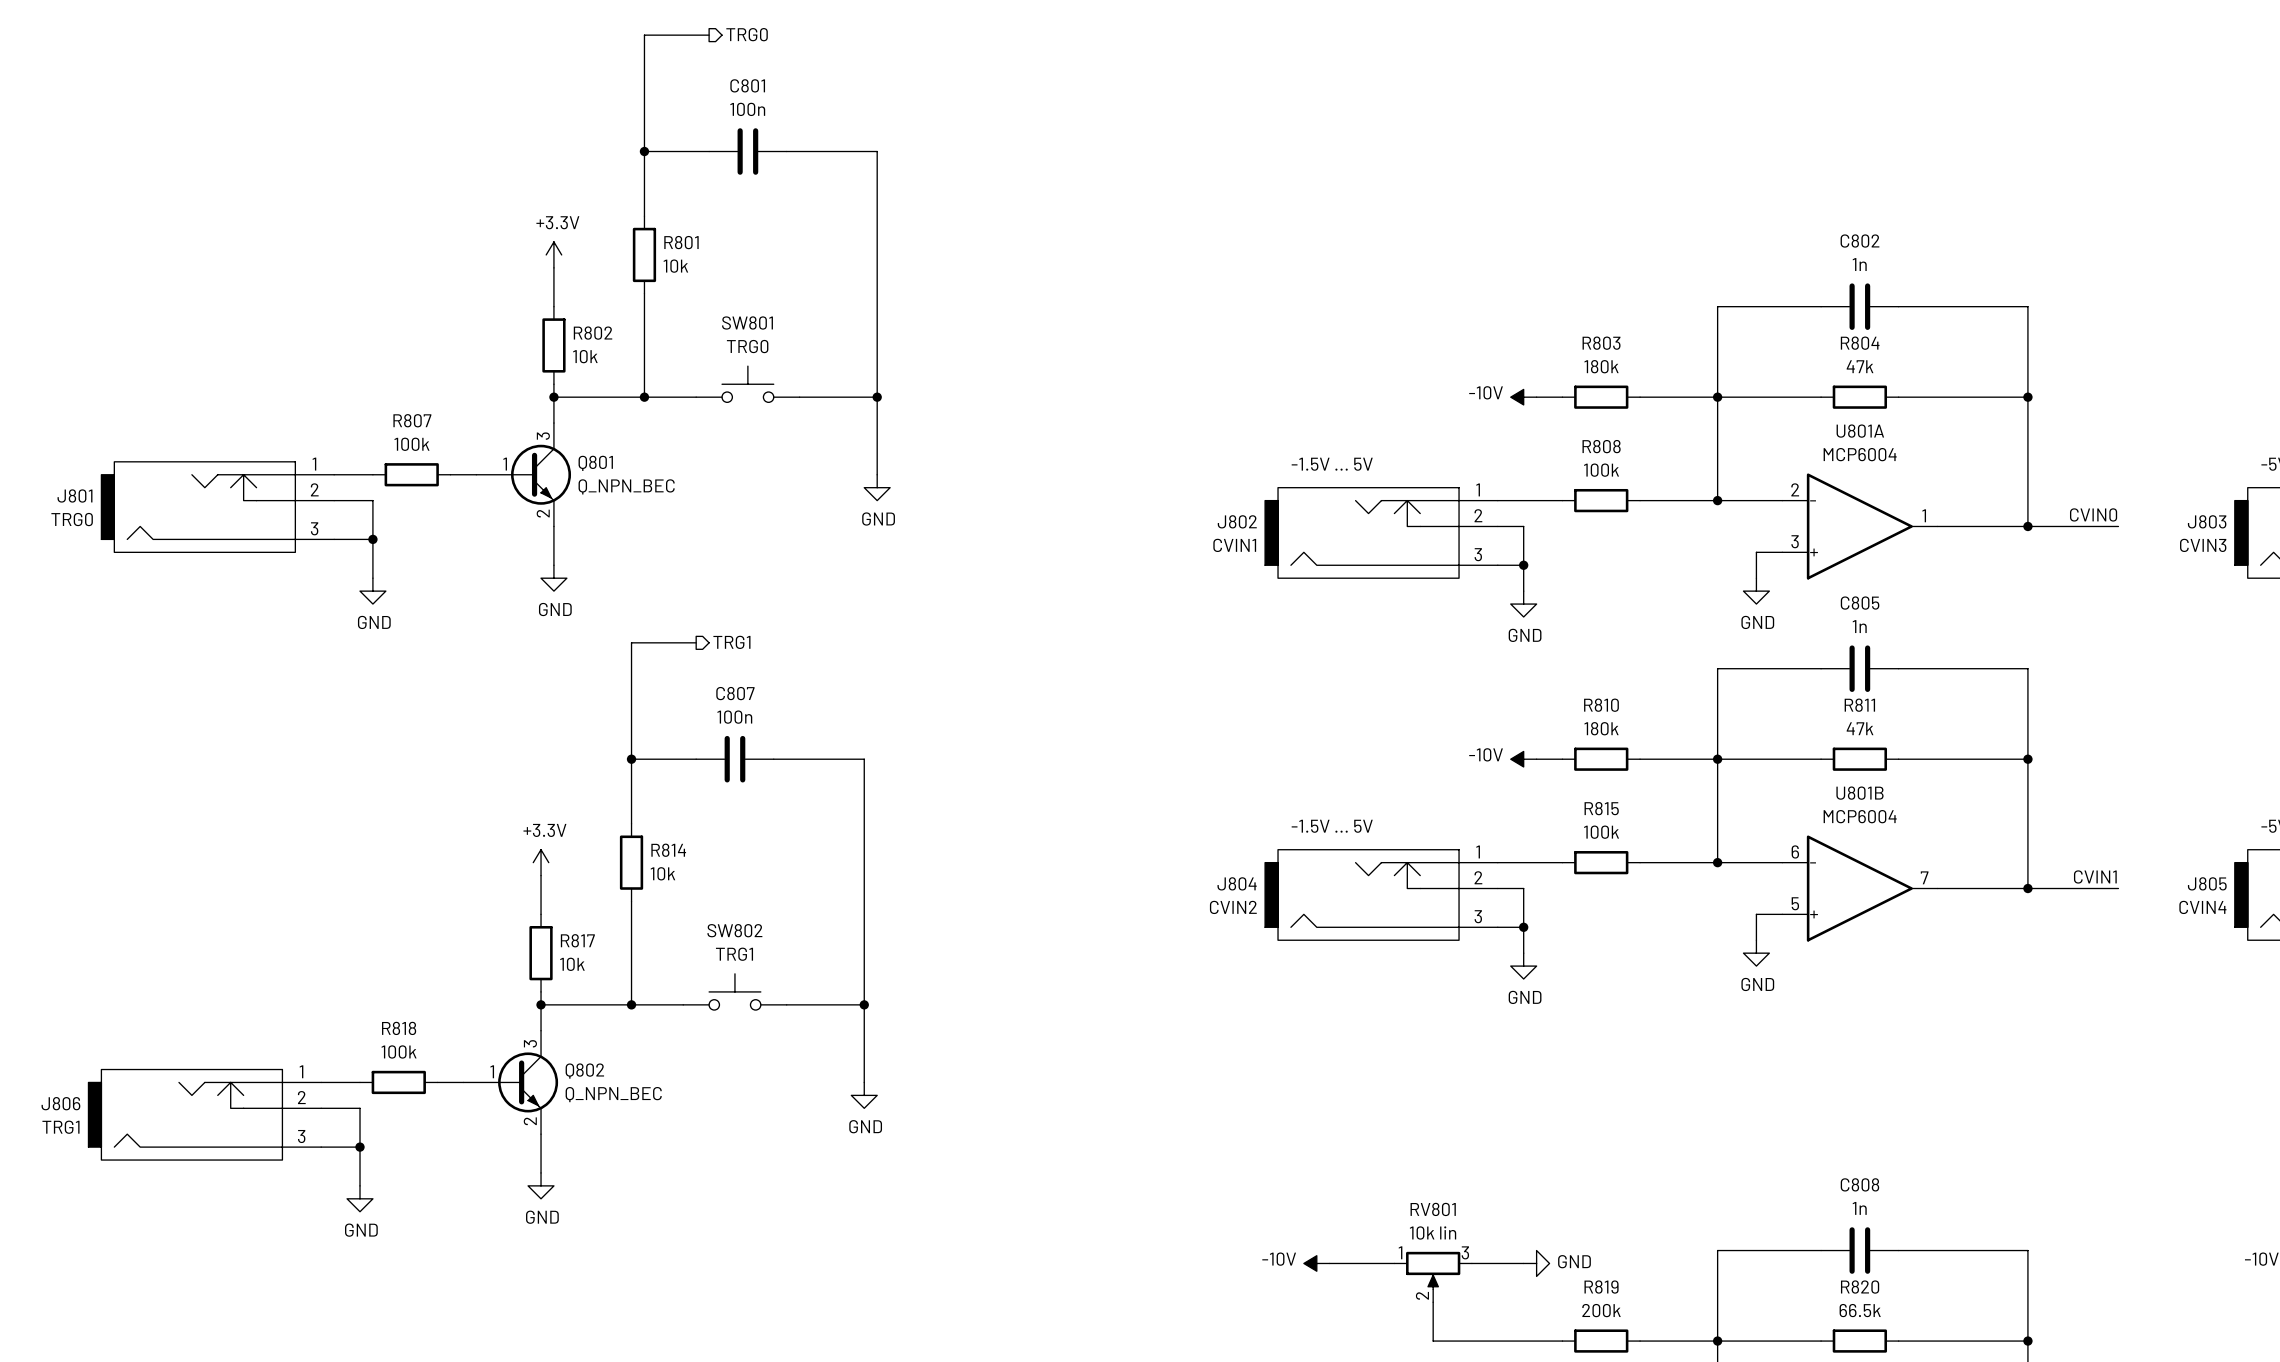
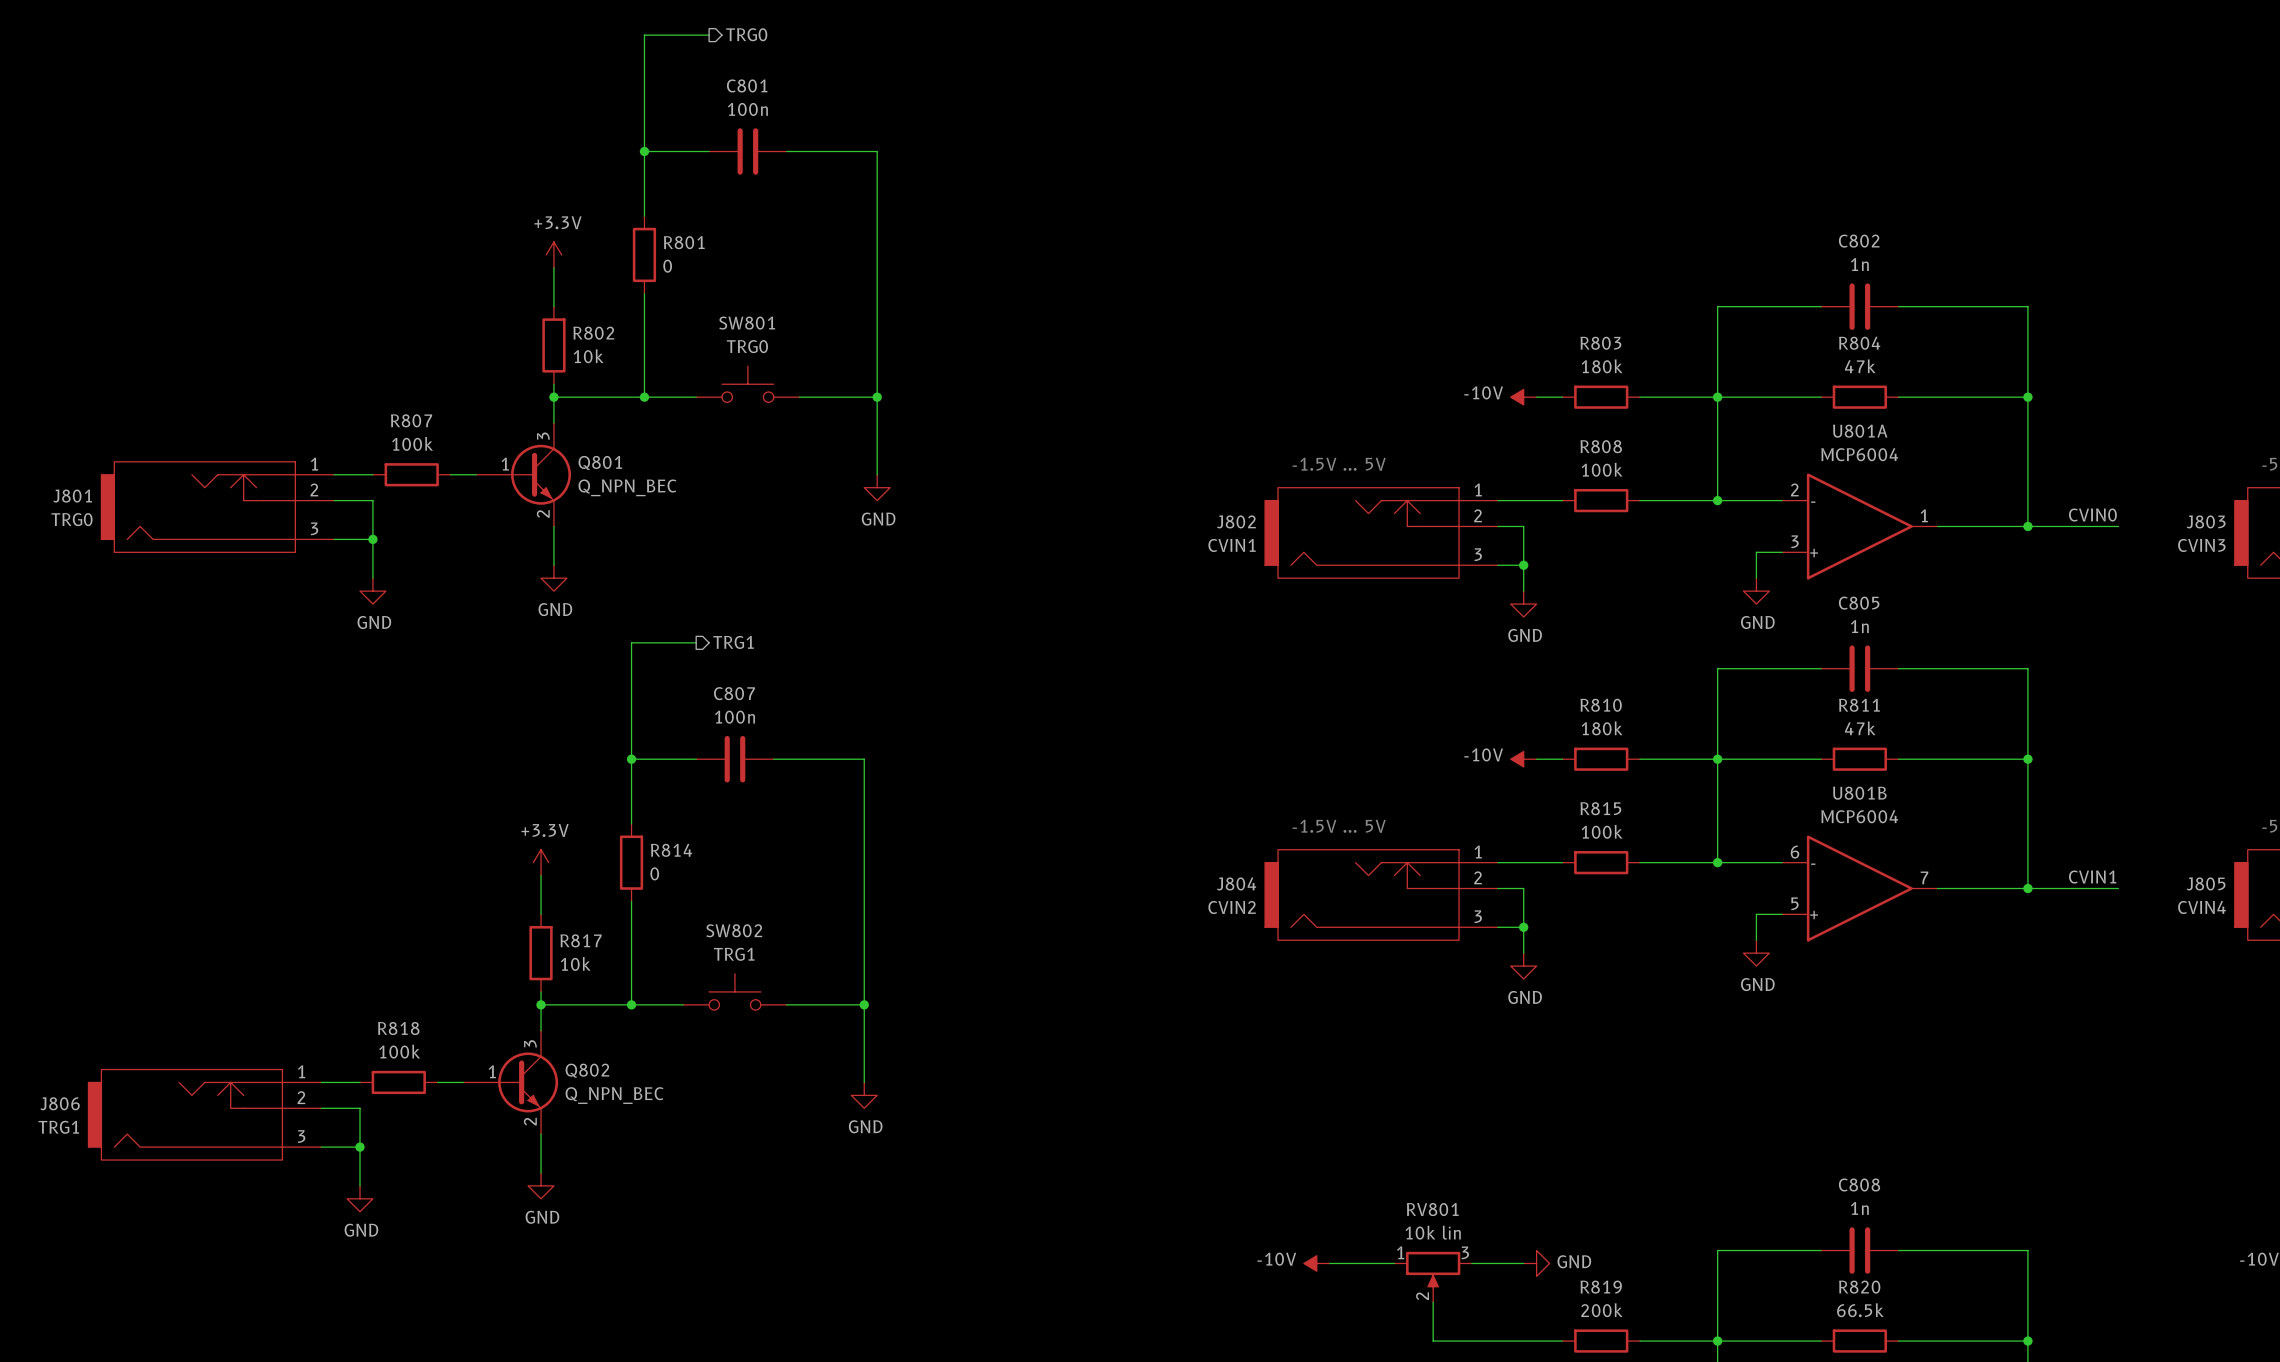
R801 value: 10k (675, 266) -> 0 (667, 266)
R814 value: 10k (662, 873) -> 0 (654, 873)

